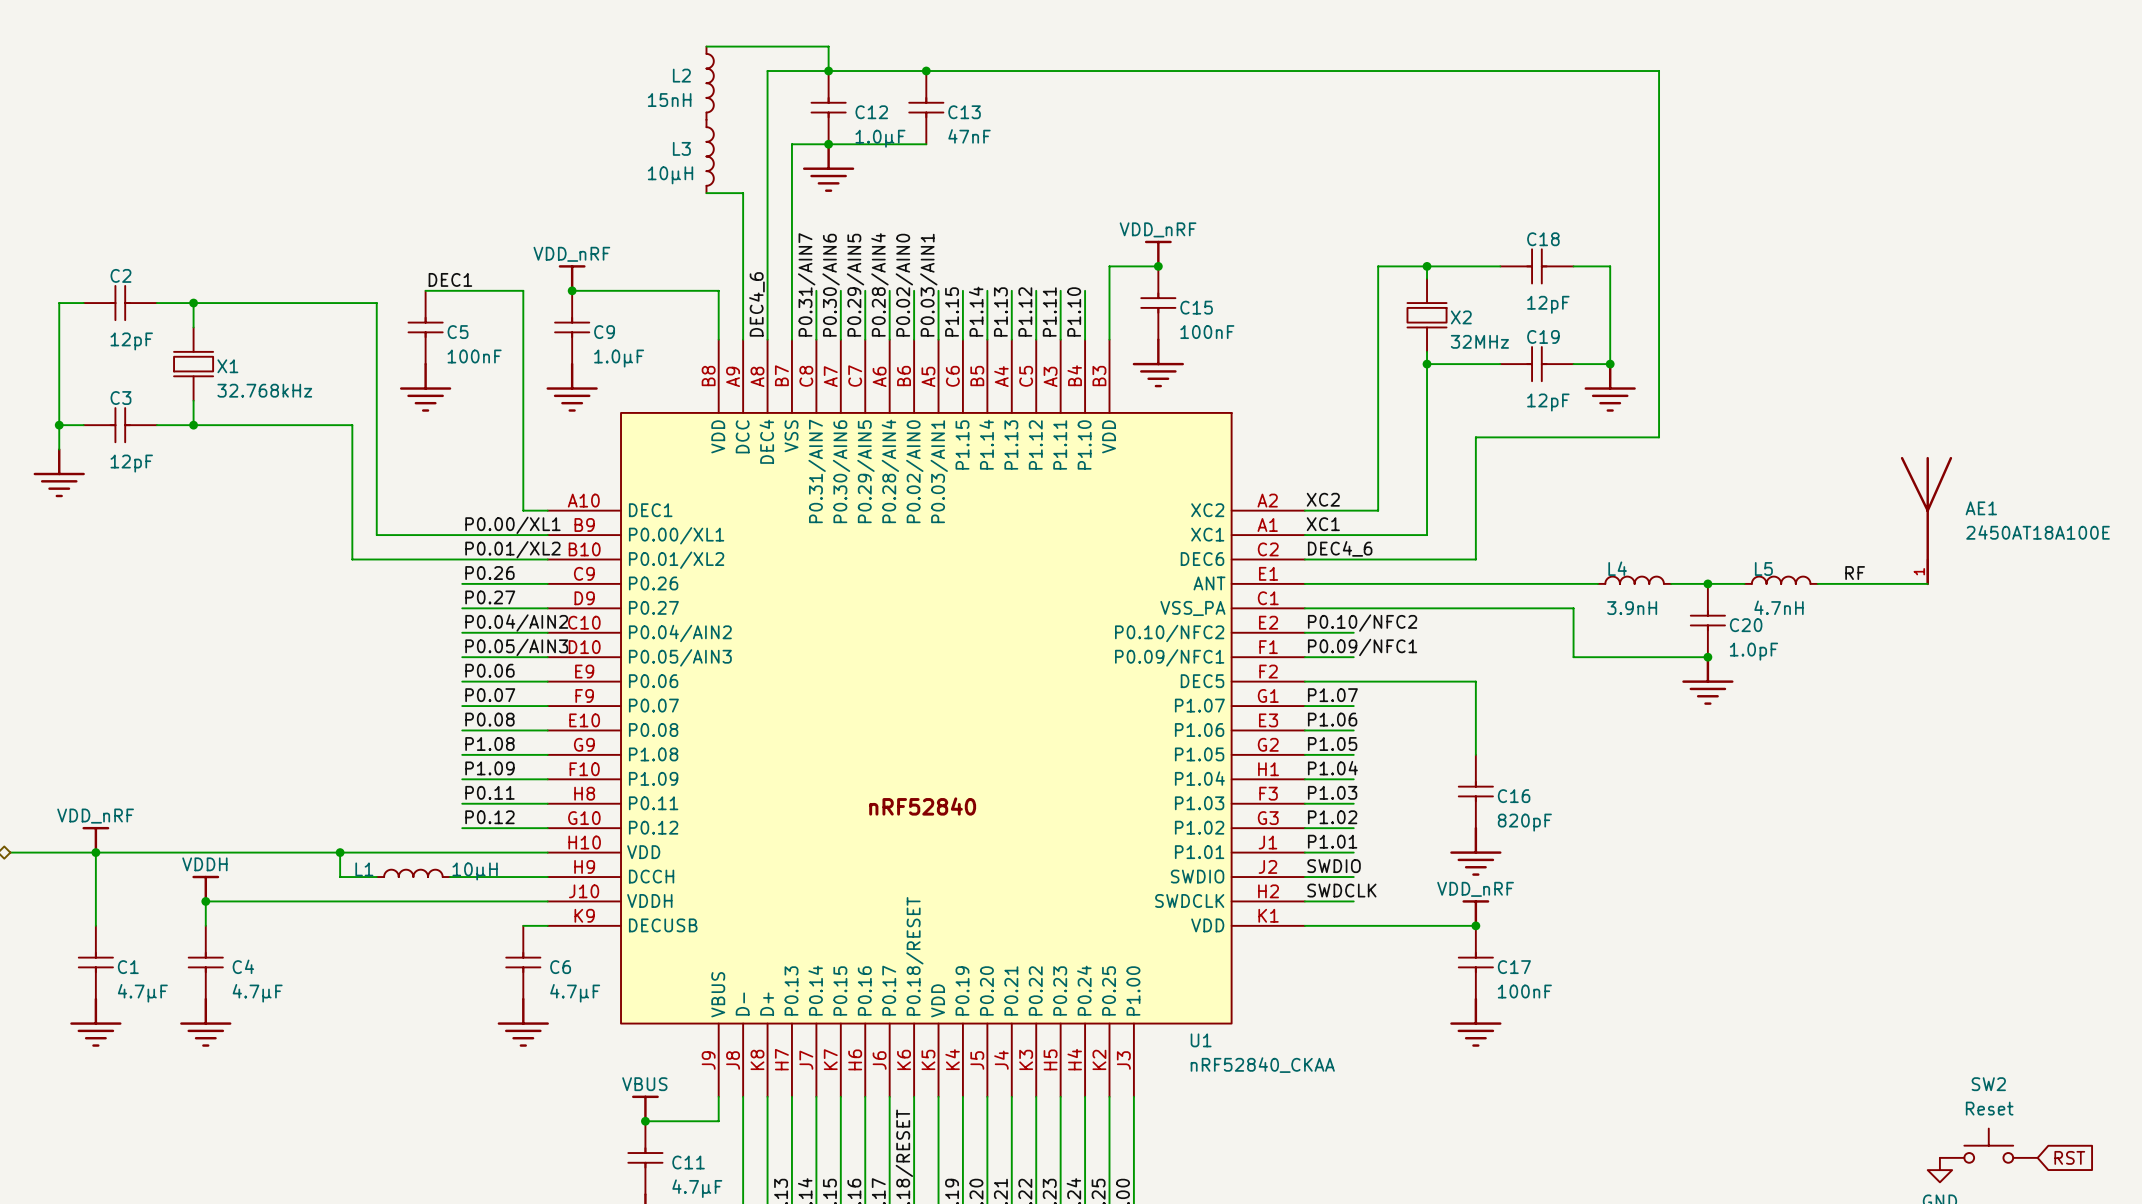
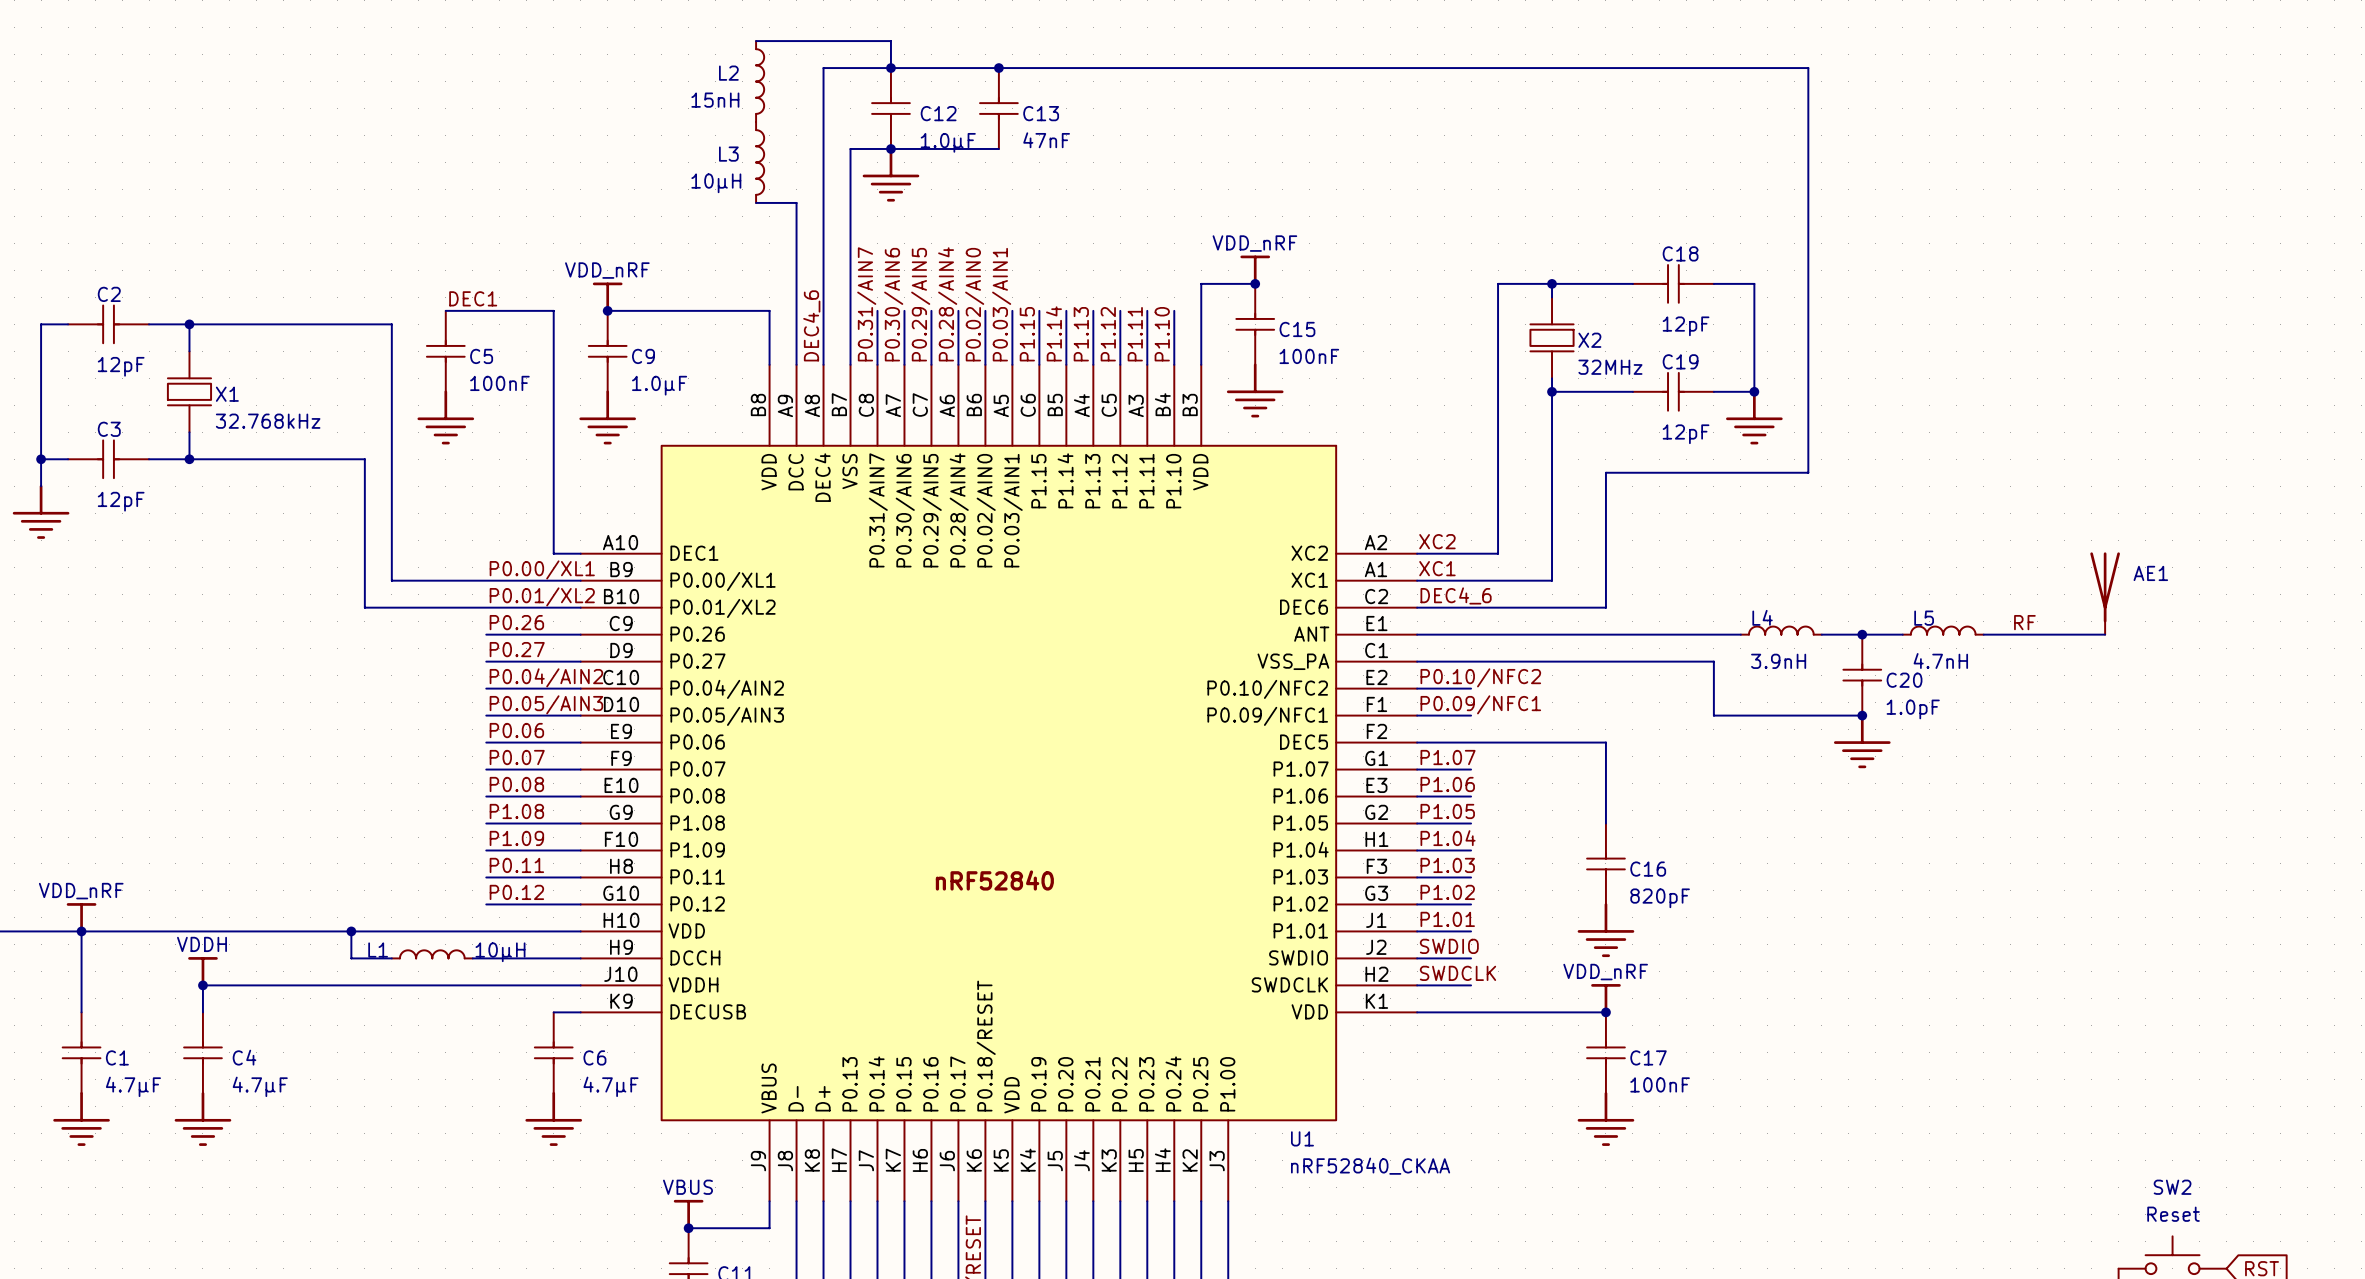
AE1 symbol: [1900, 456, 1953, 586] -> [2090, 552, 2120, 635]
AE1 value: 2450AT18A100E (2038, 532) -> none

